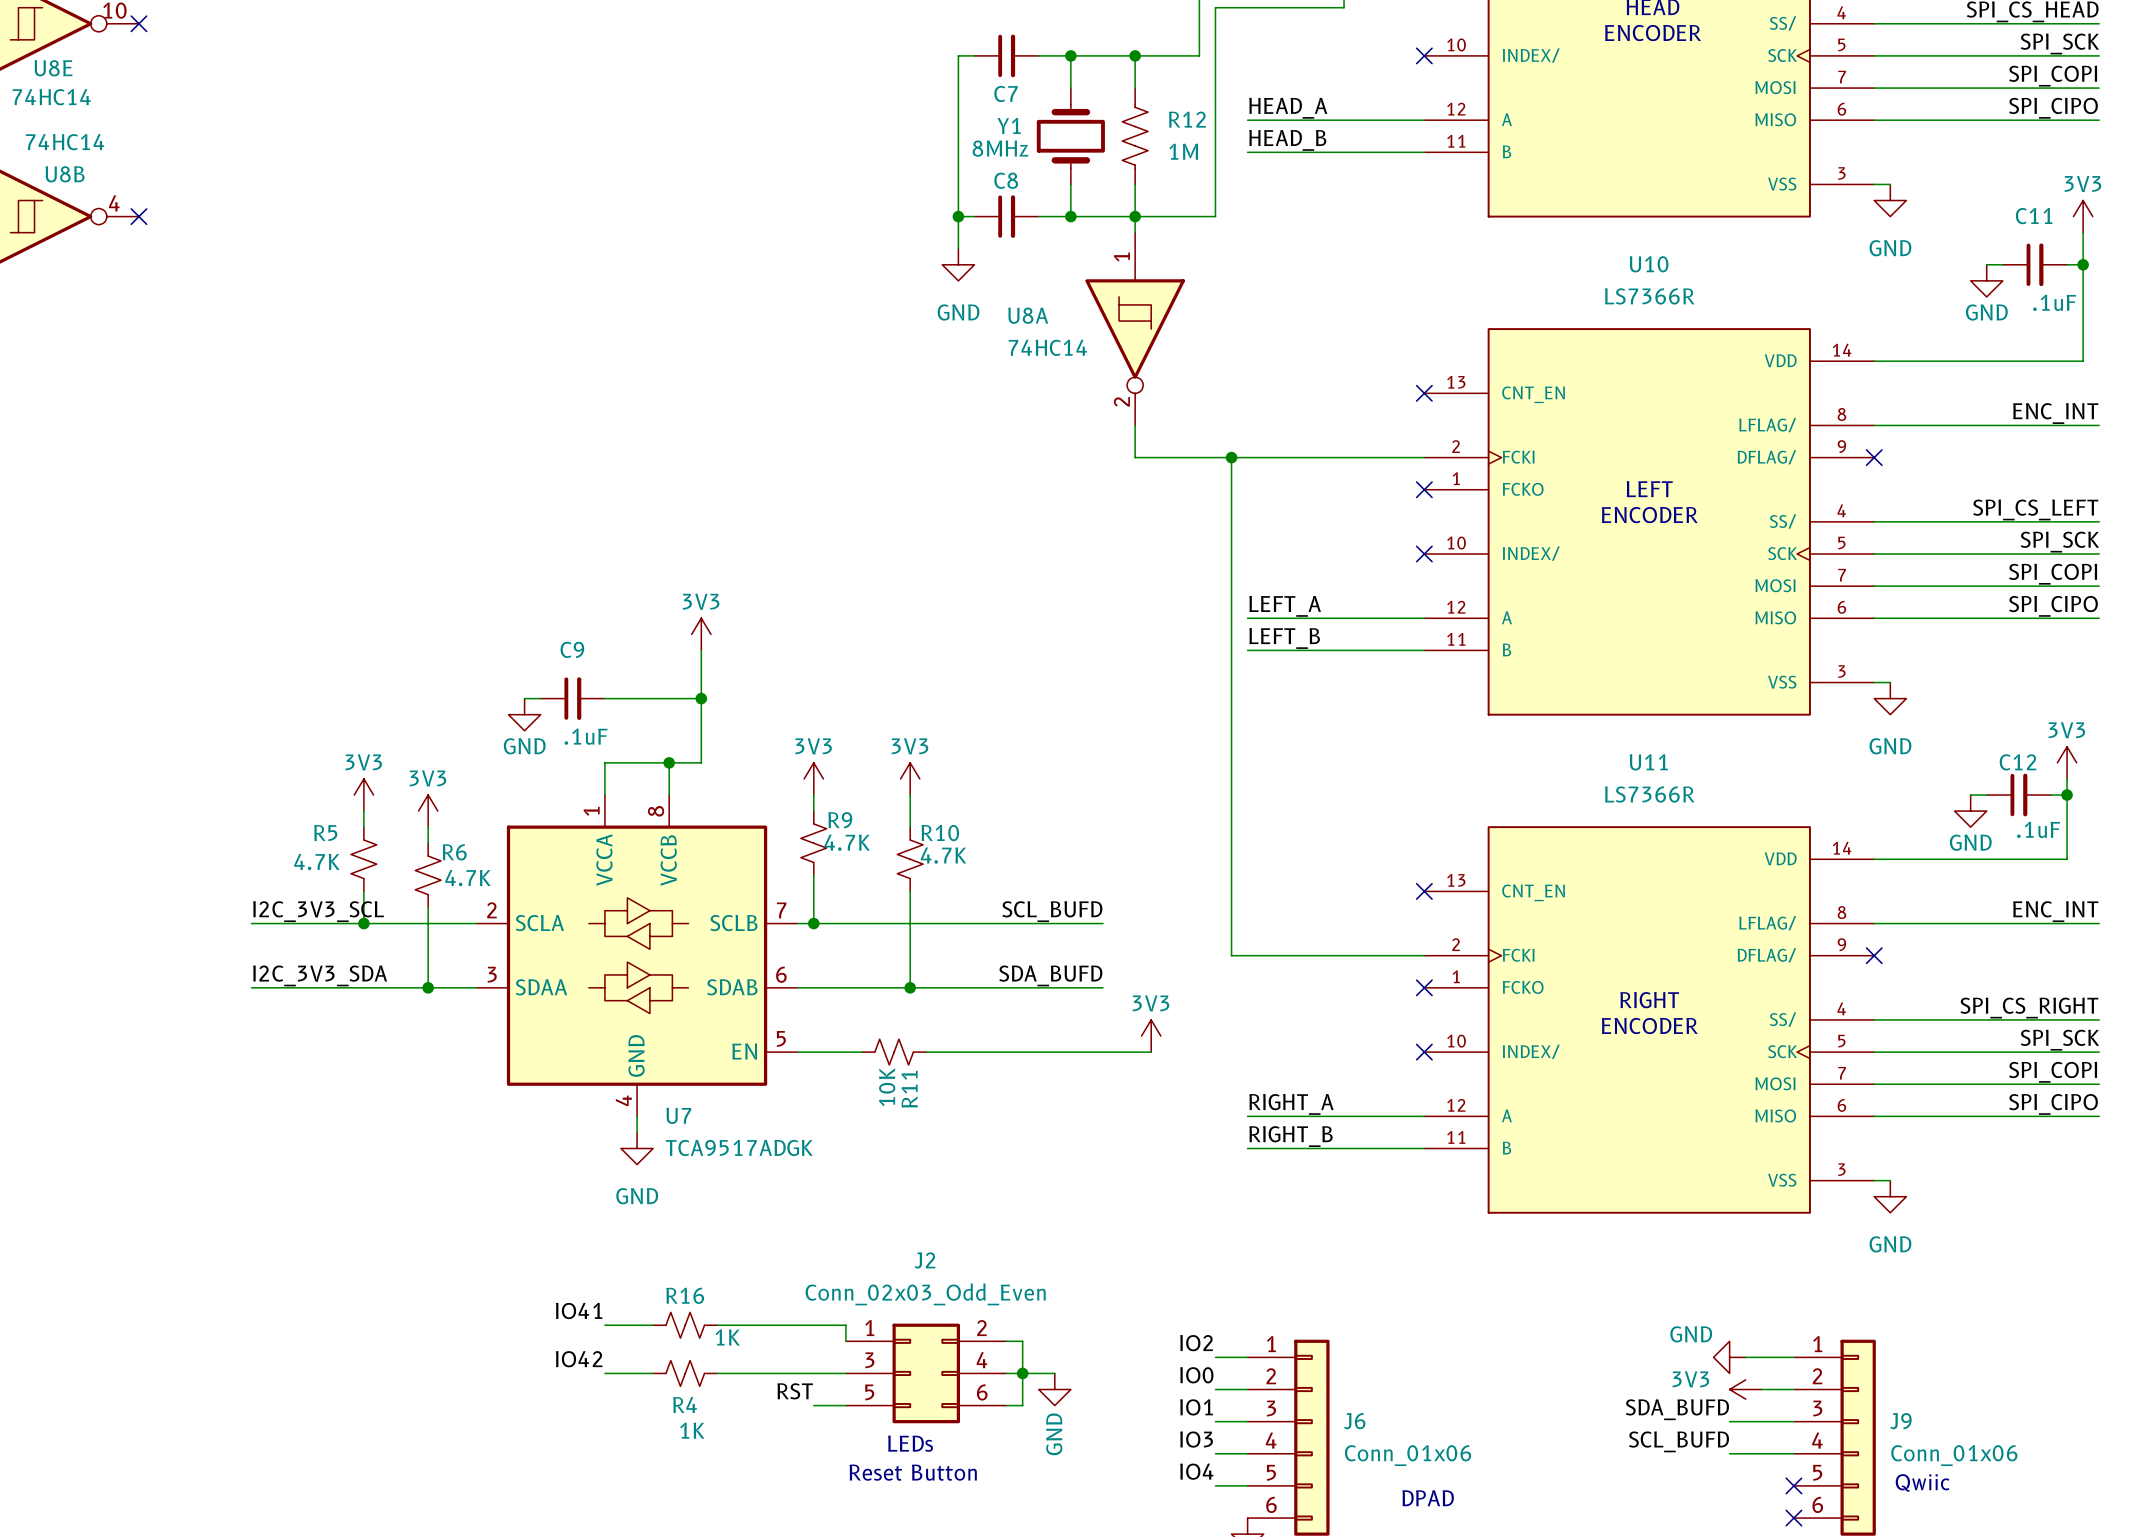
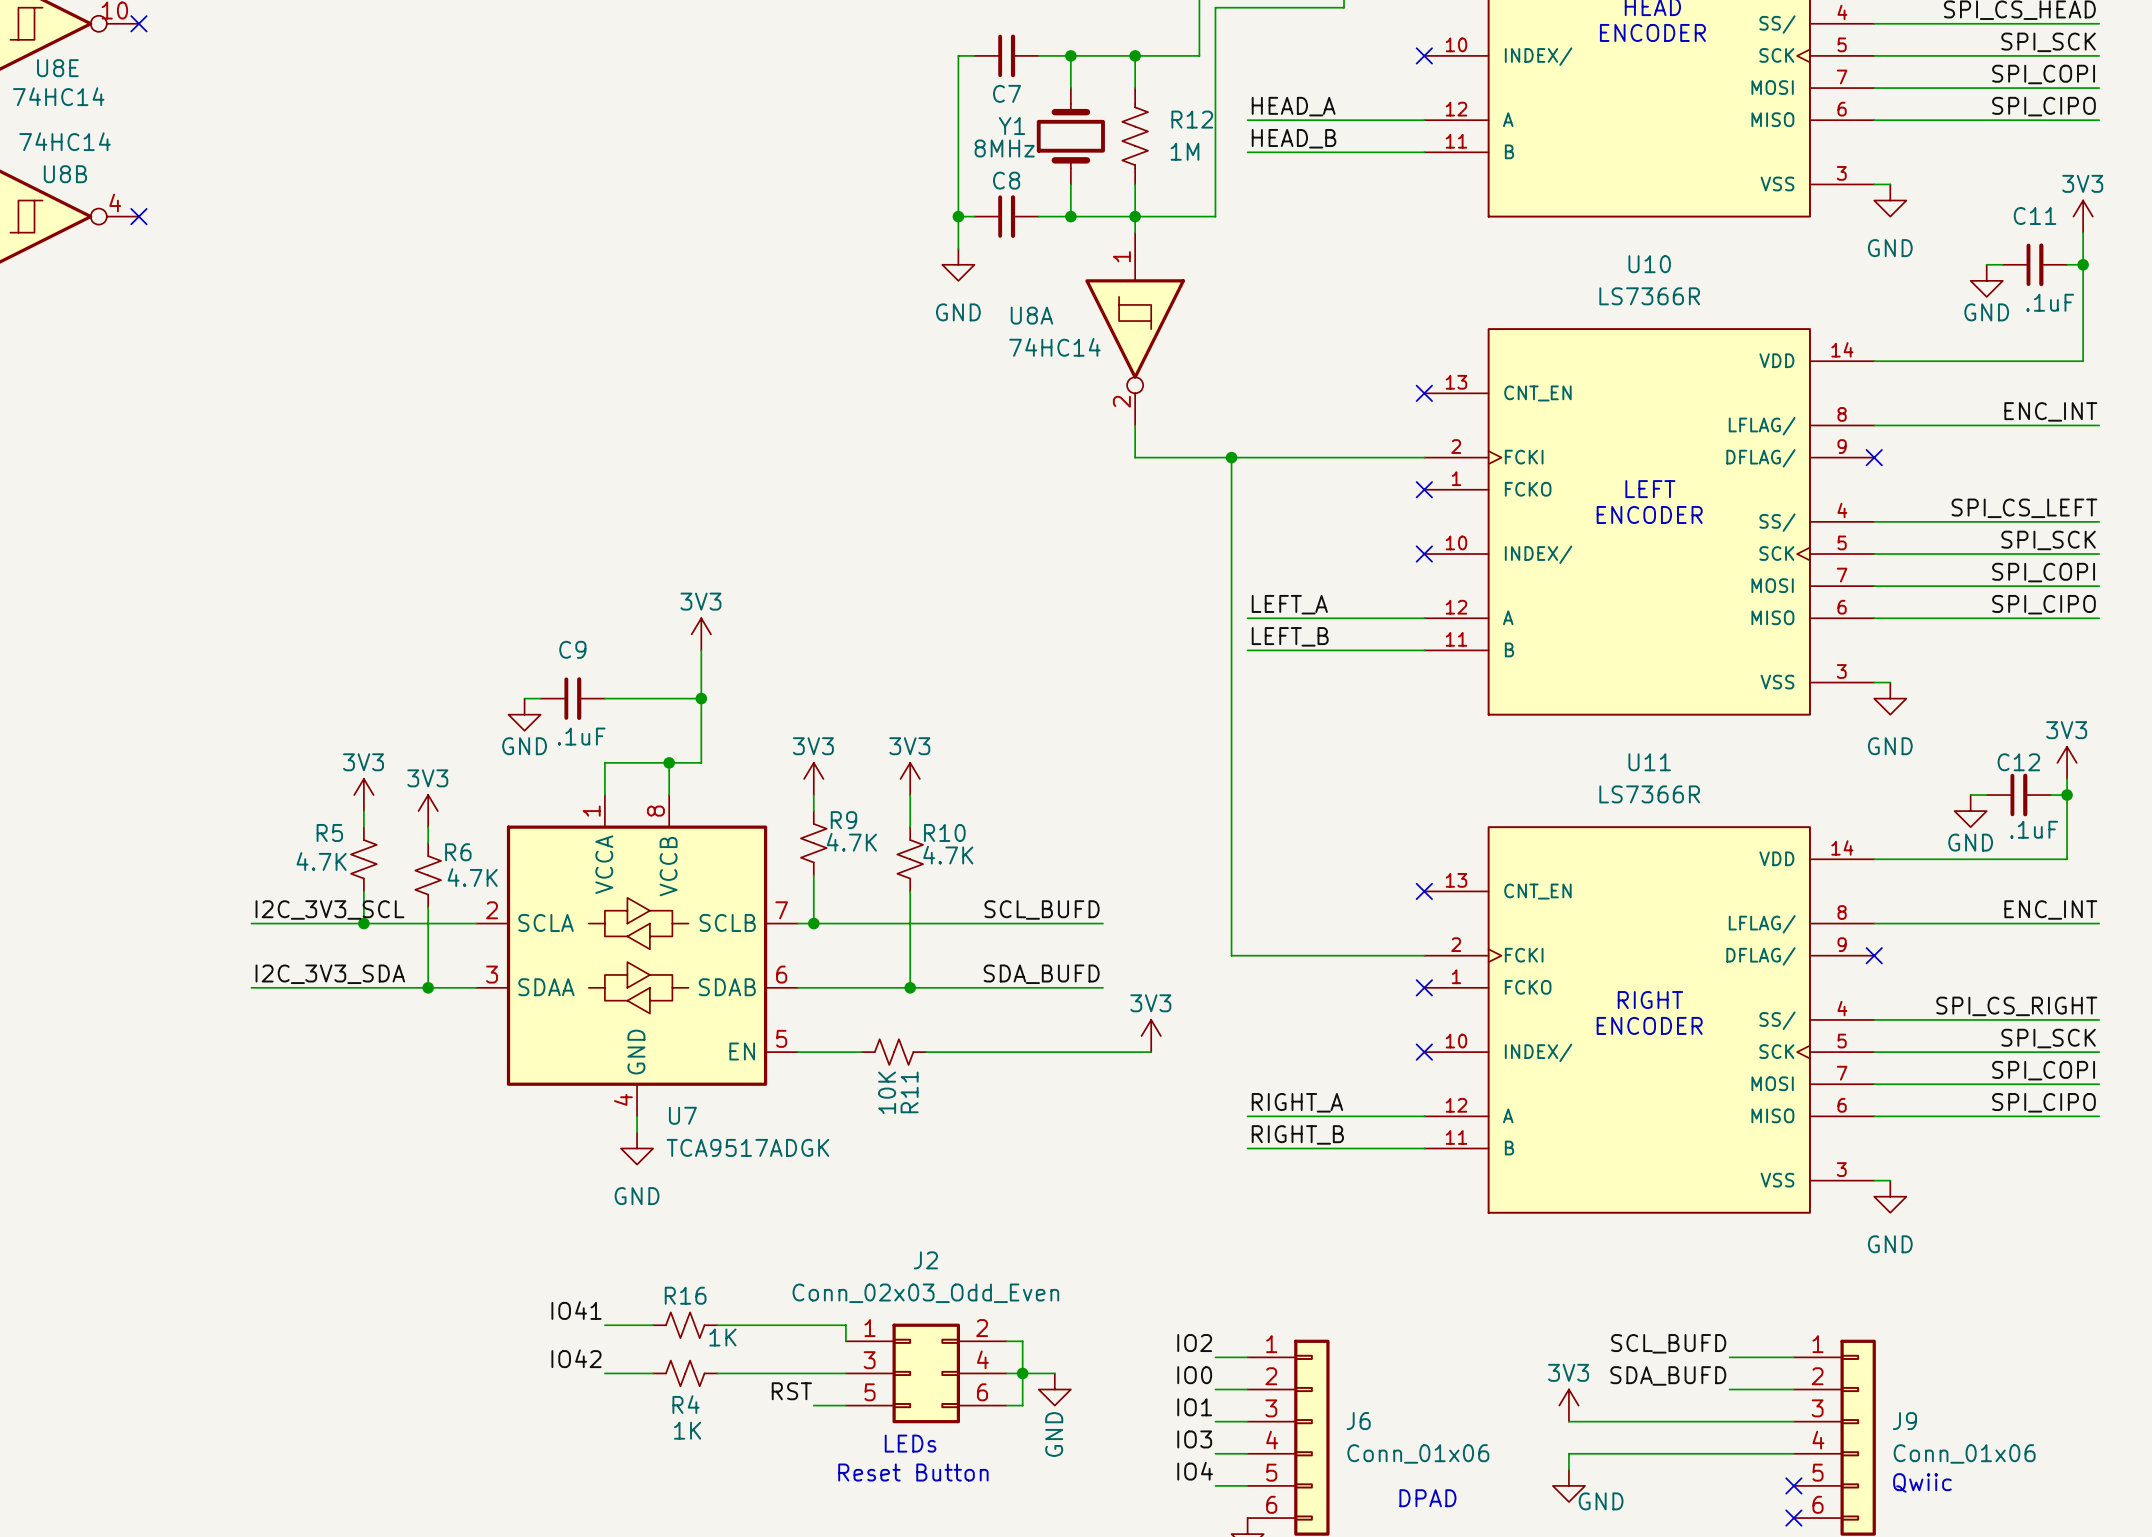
power symbol text position: GND (1691, 1334) -> GND (1601, 1501)
power symbol rotation: 0° (1729, 1357) -> 90° counterclockwise (1568, 1485)
power symbol position: GND (1729, 1357) -> GND (1568, 1485)
power symbol rotation: 0° (1745, 1389) -> 90° clockwise (1568, 1405)
power symbol position: 3V3 (1745, 1389) -> 3V3 (1568, 1405)
label position: SDA_BUFD (1677, 1409) -> SDA_BUFD (1668, 1375)
wire: none -> (1568, 1421) (1729, 1421)
label position: SCL_BUFD (1679, 1441) -> SCL_BUFD (1668, 1343)
wire: none -> (1729, 1453) (1568, 1453) (1568, 1469)

